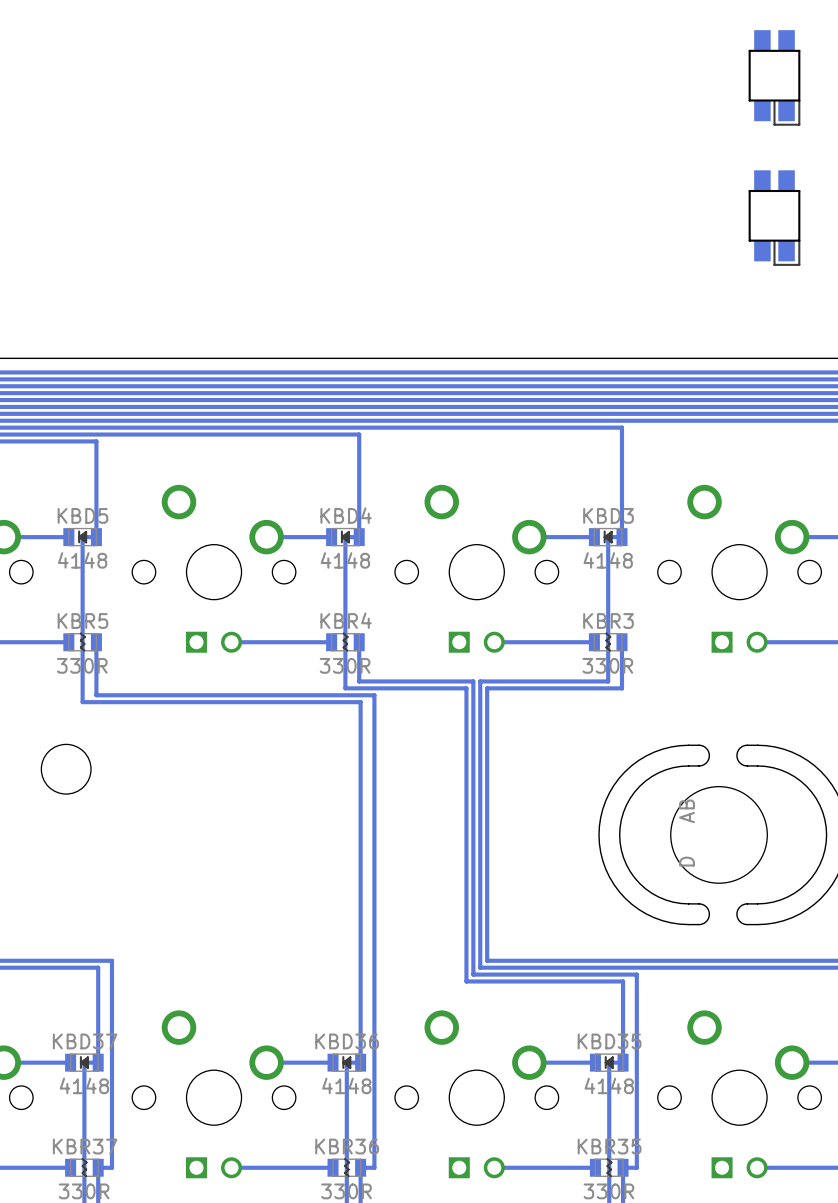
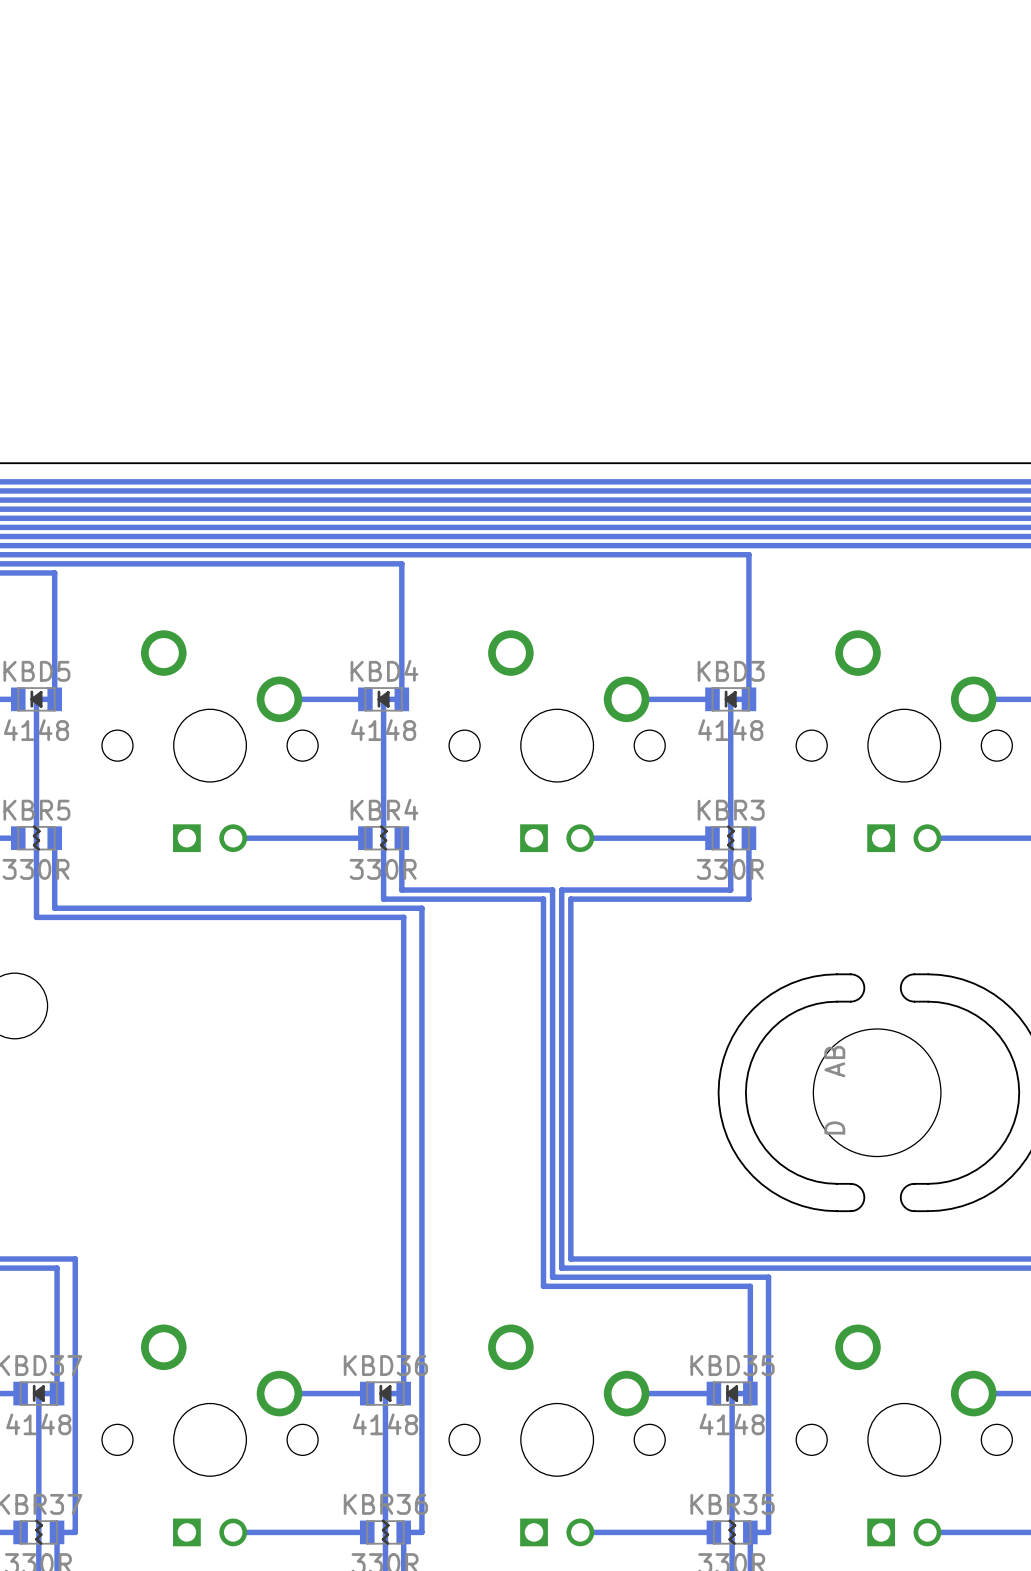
part: (774, 77) -> none
part: (774, 218) -> none

